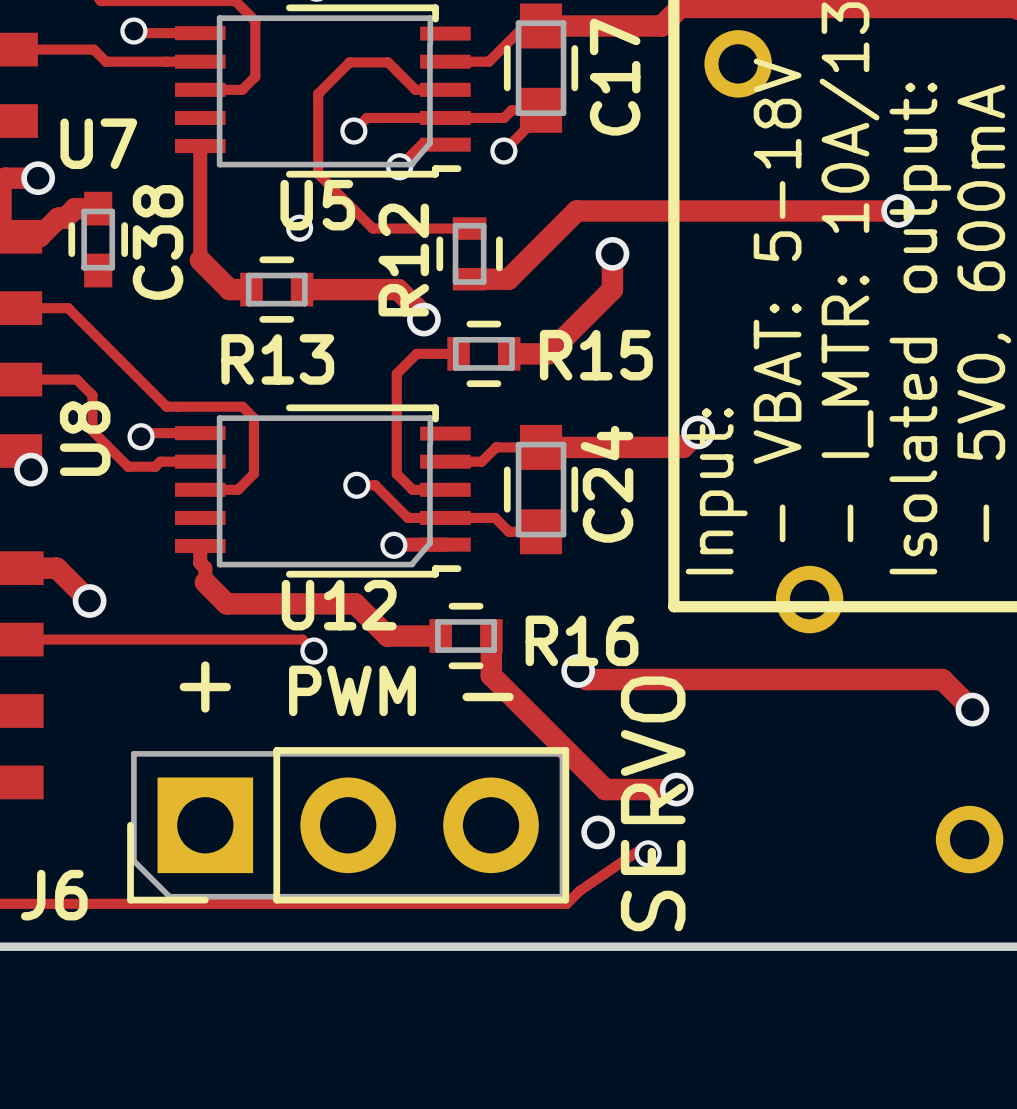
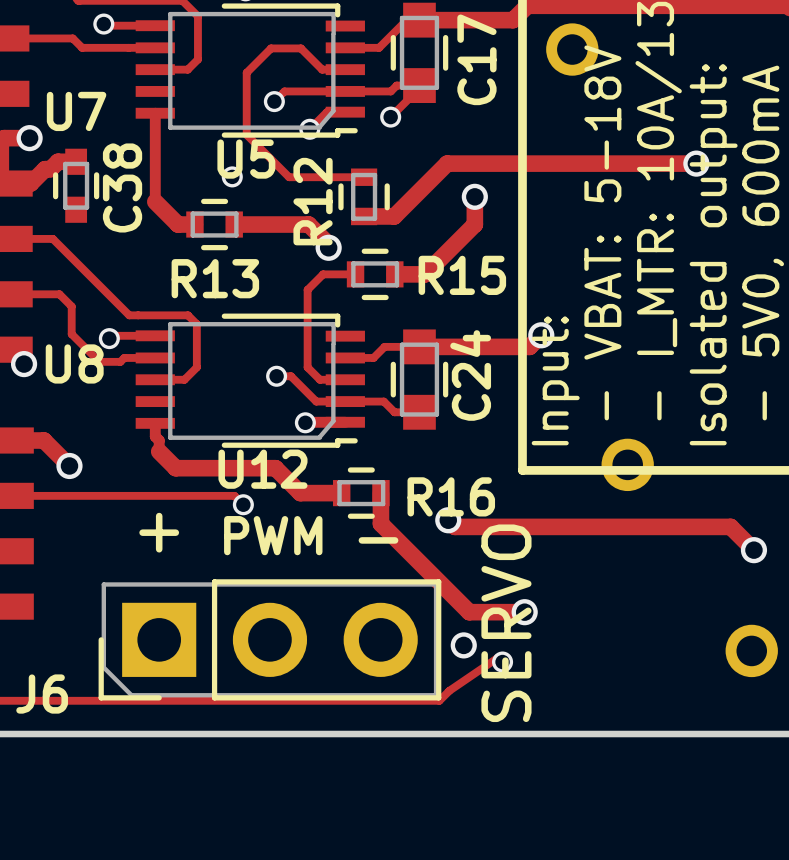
U8 name rotation: 0° (85, 438) -> 90° clockwise (74, 363)

